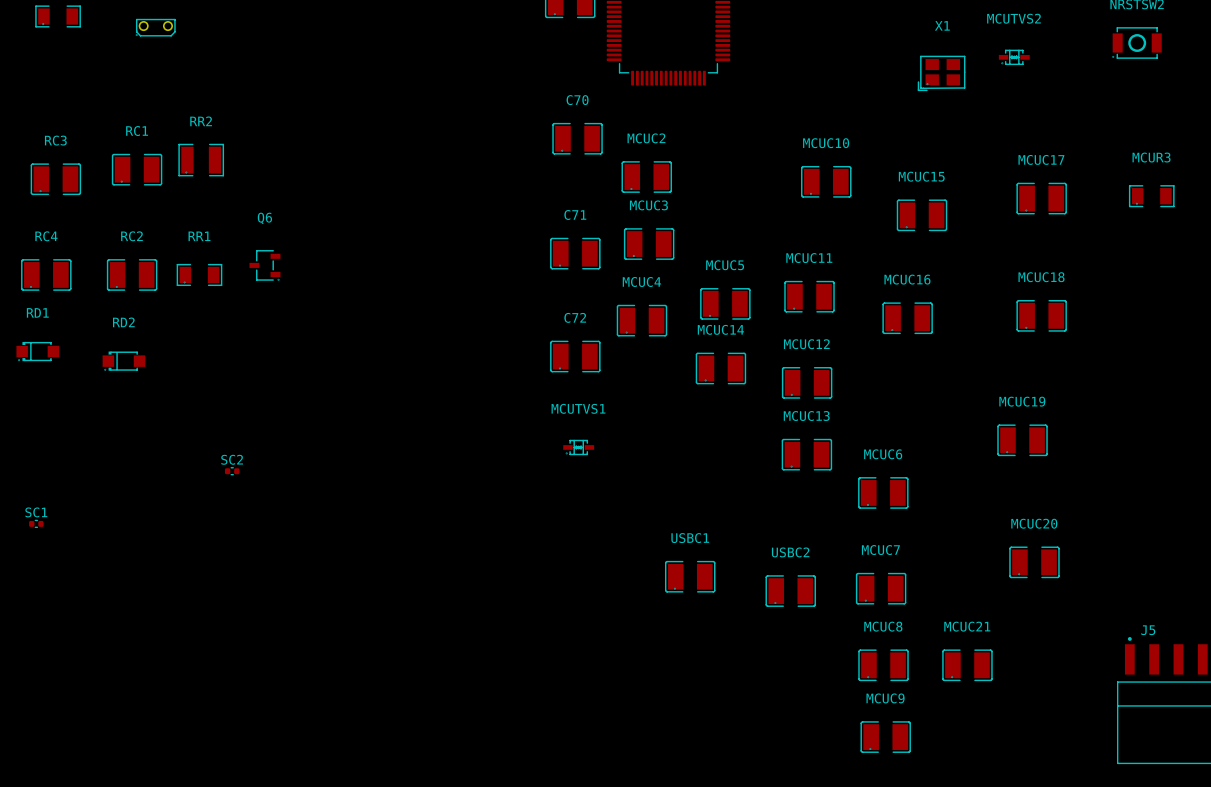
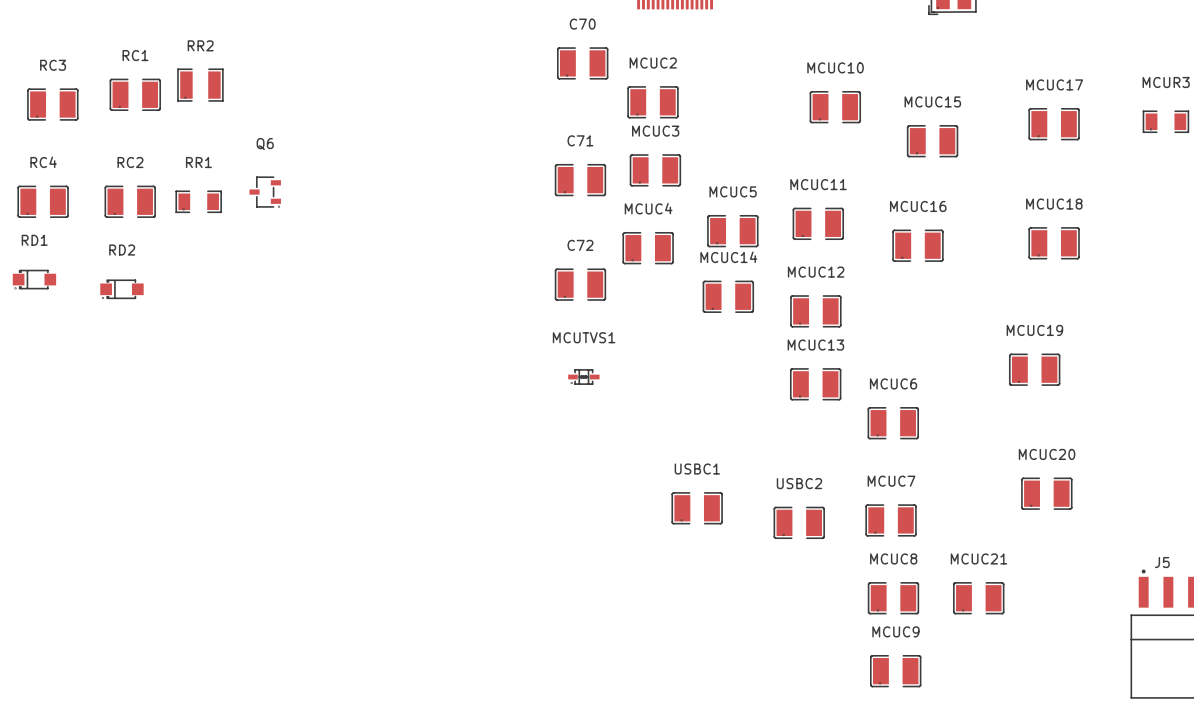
SC2: (232, 471) -> none
SC1: (36, 523) -> none

